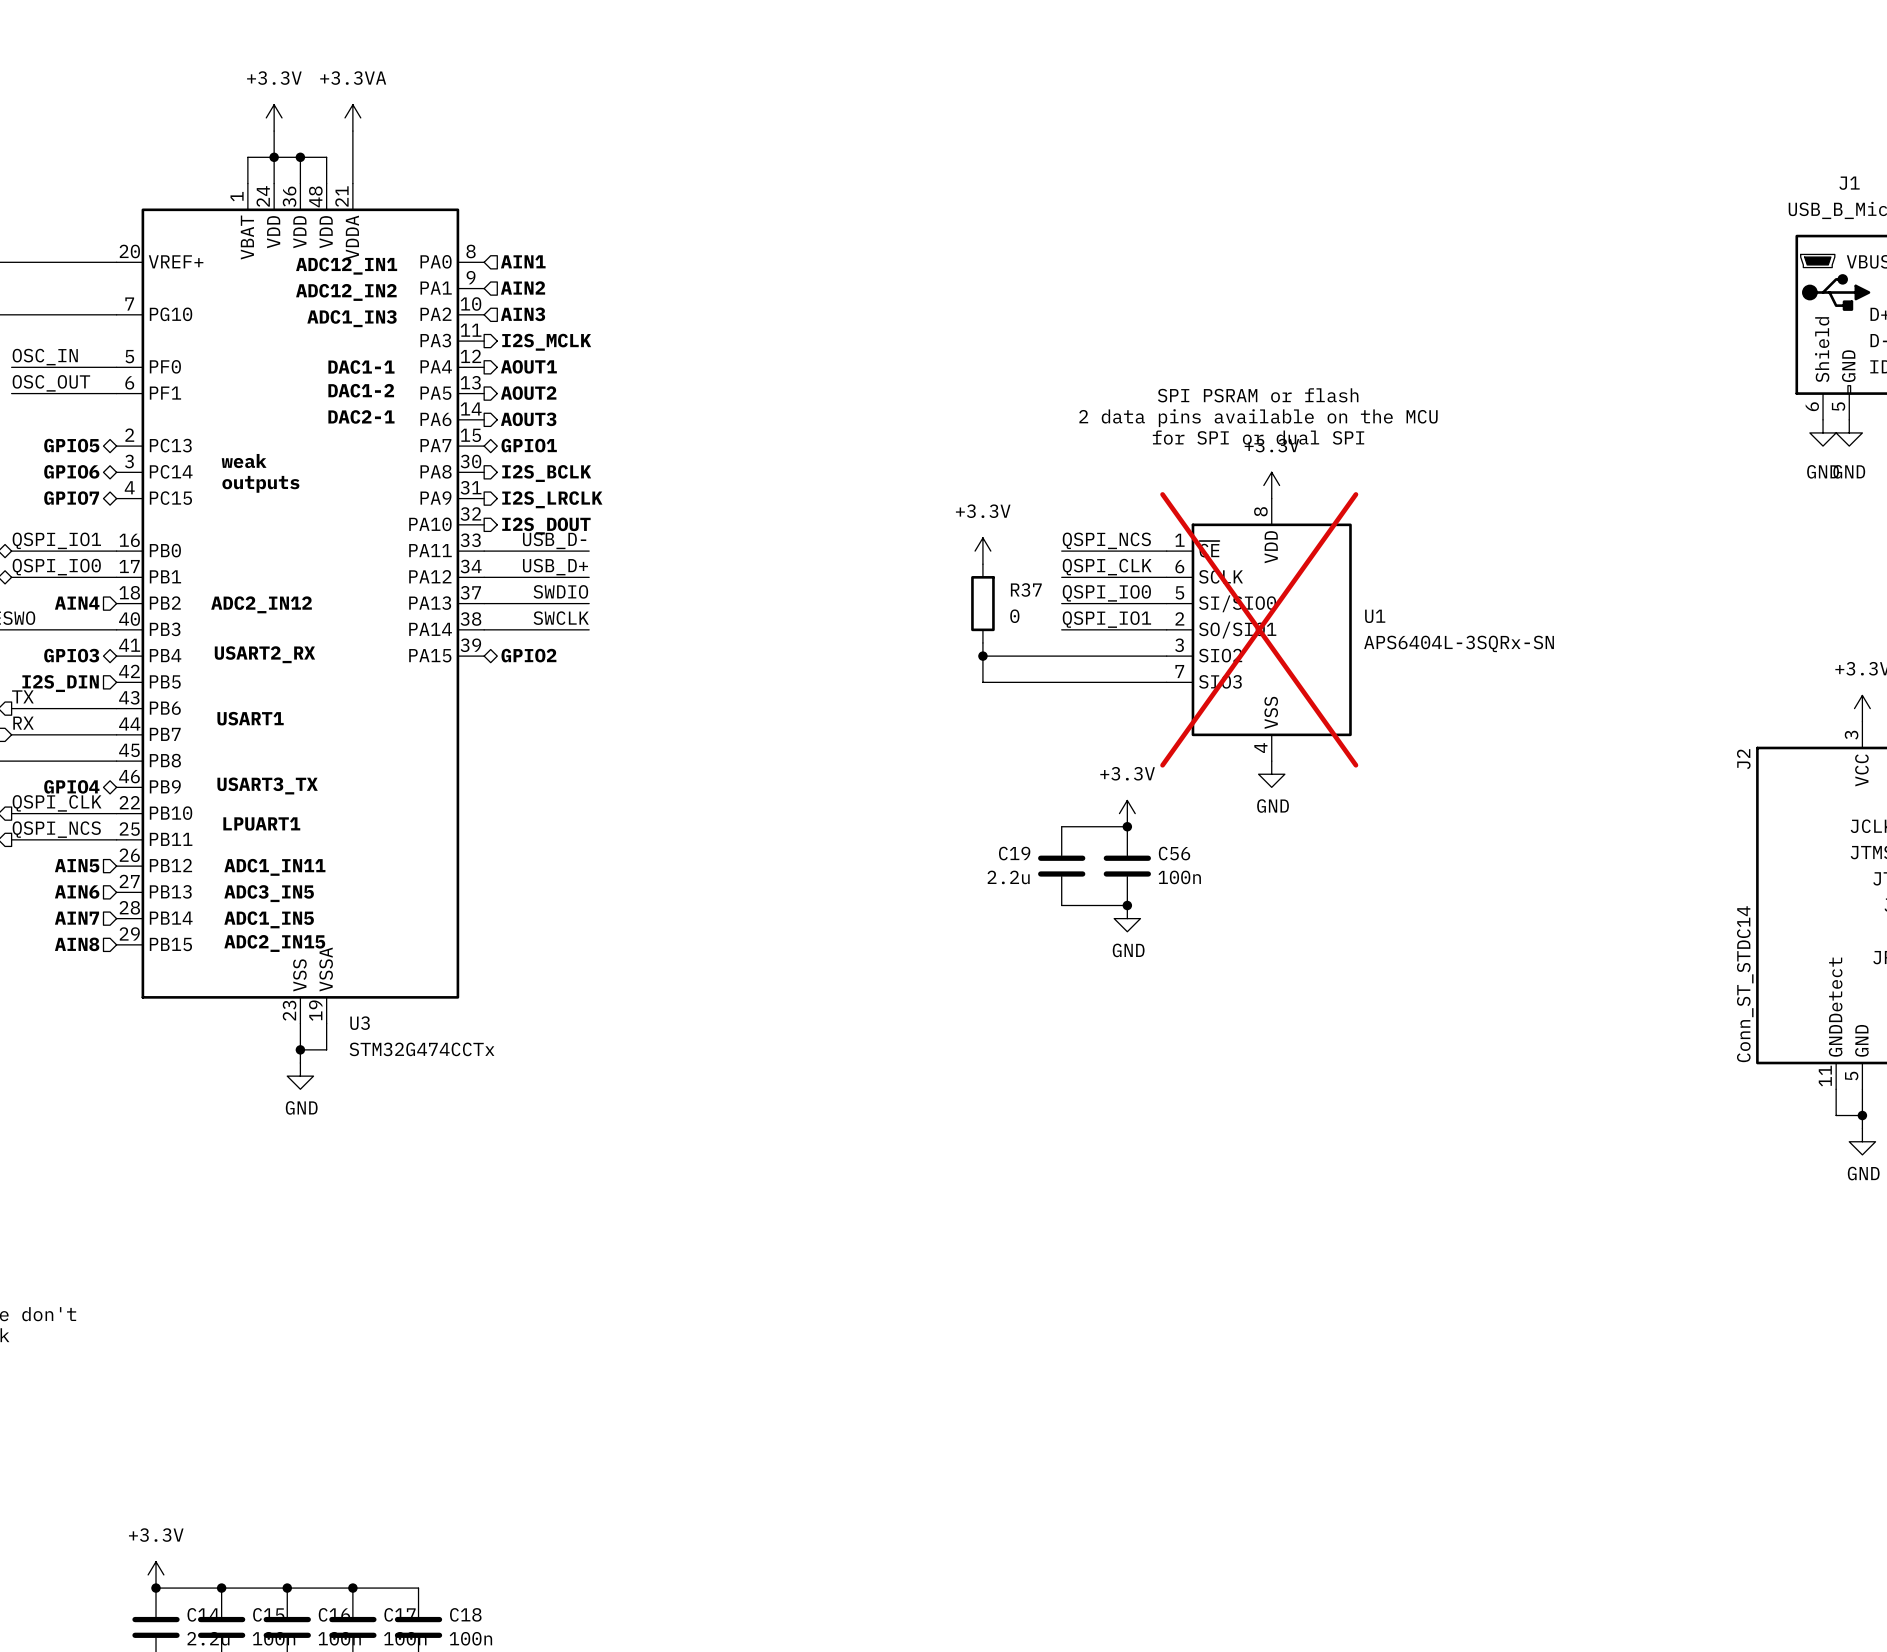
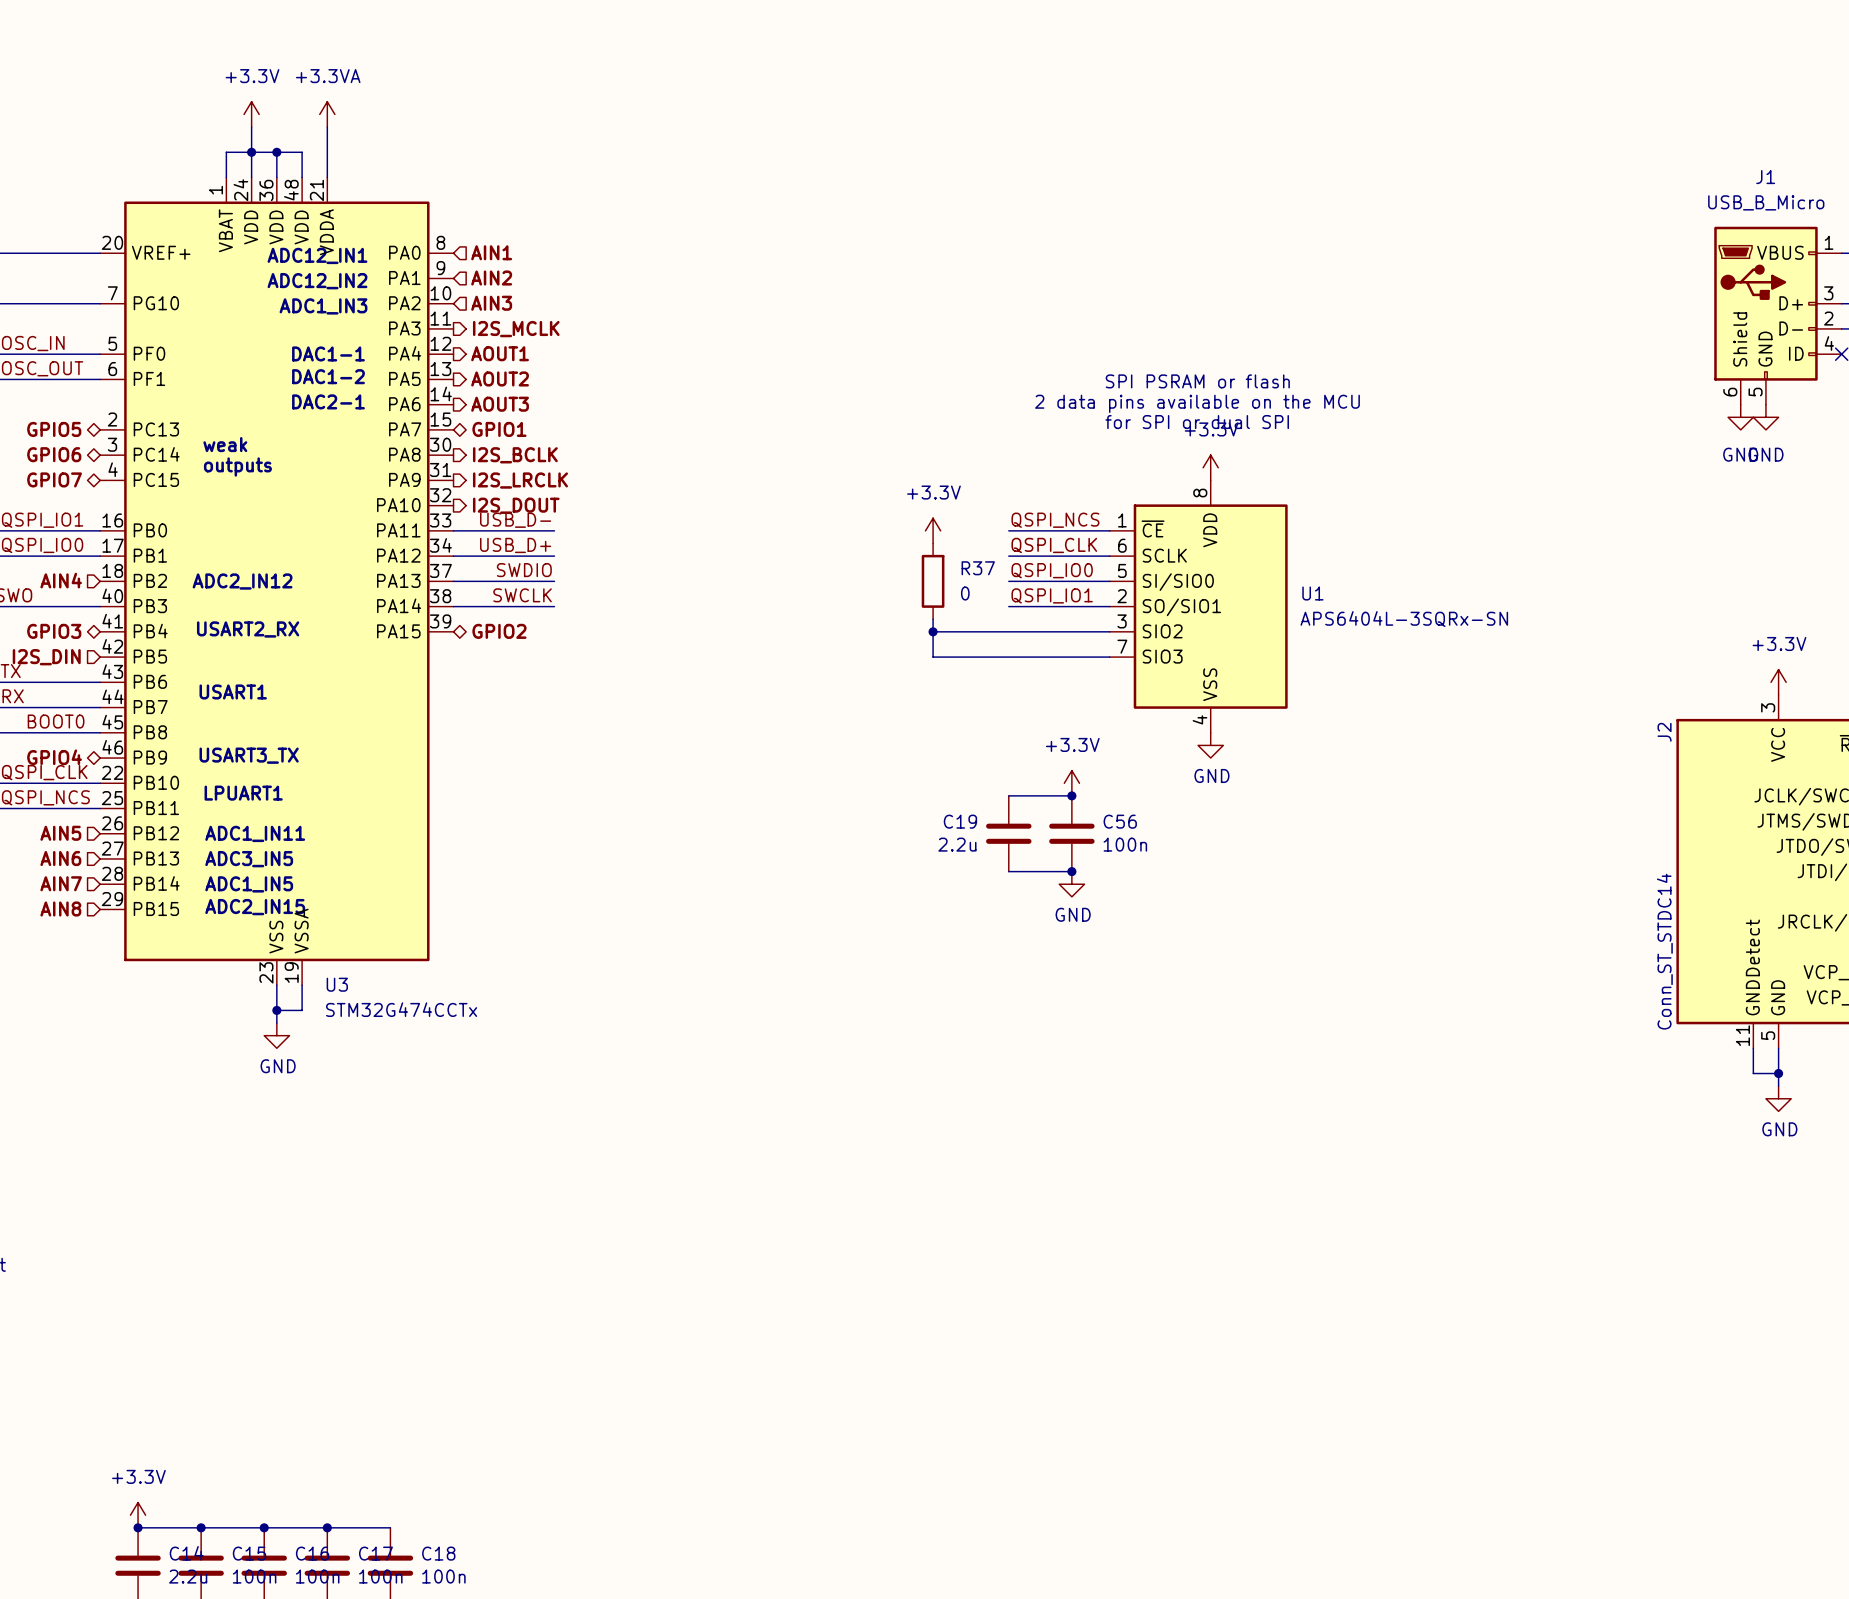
U1 do-not-place cross: (1259, 629) -> none
label: none -> BOOT0 (56, 721)

